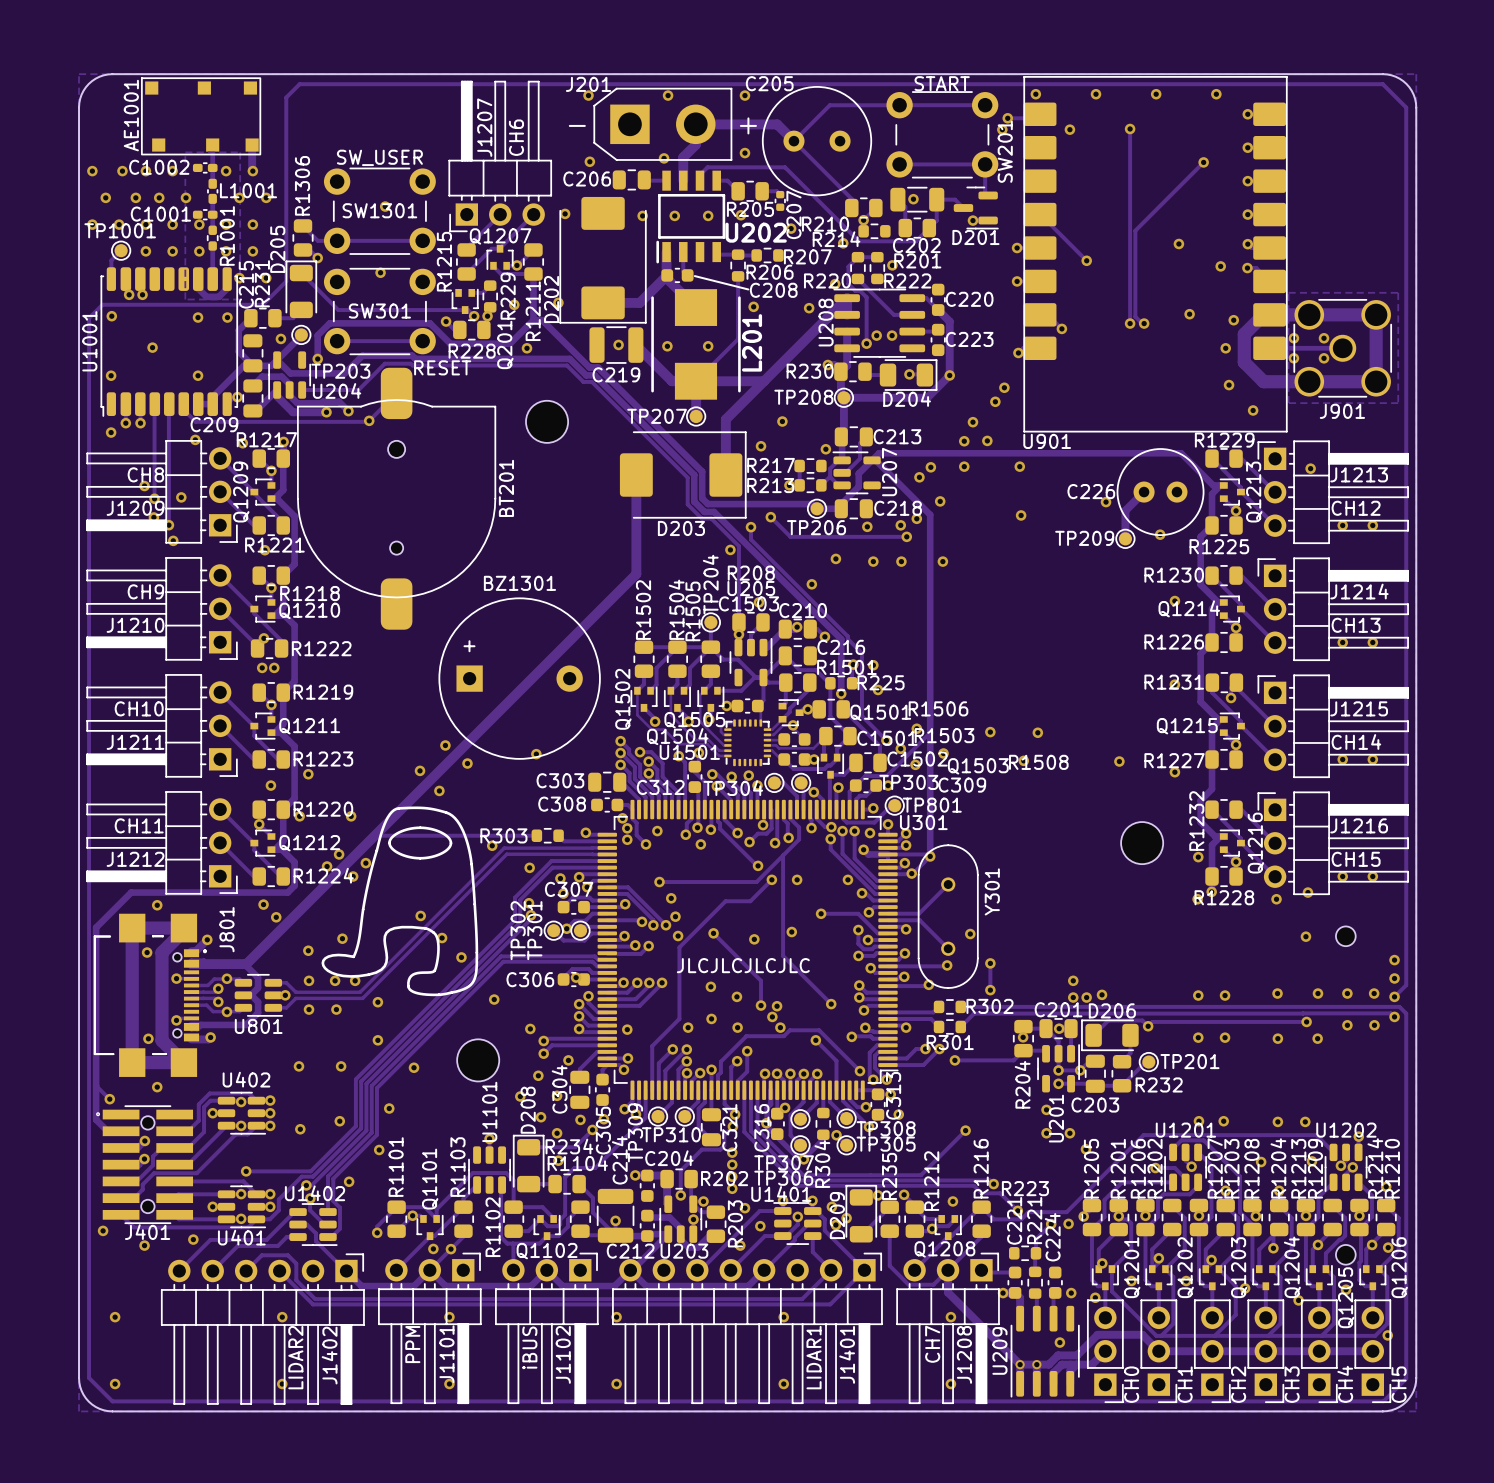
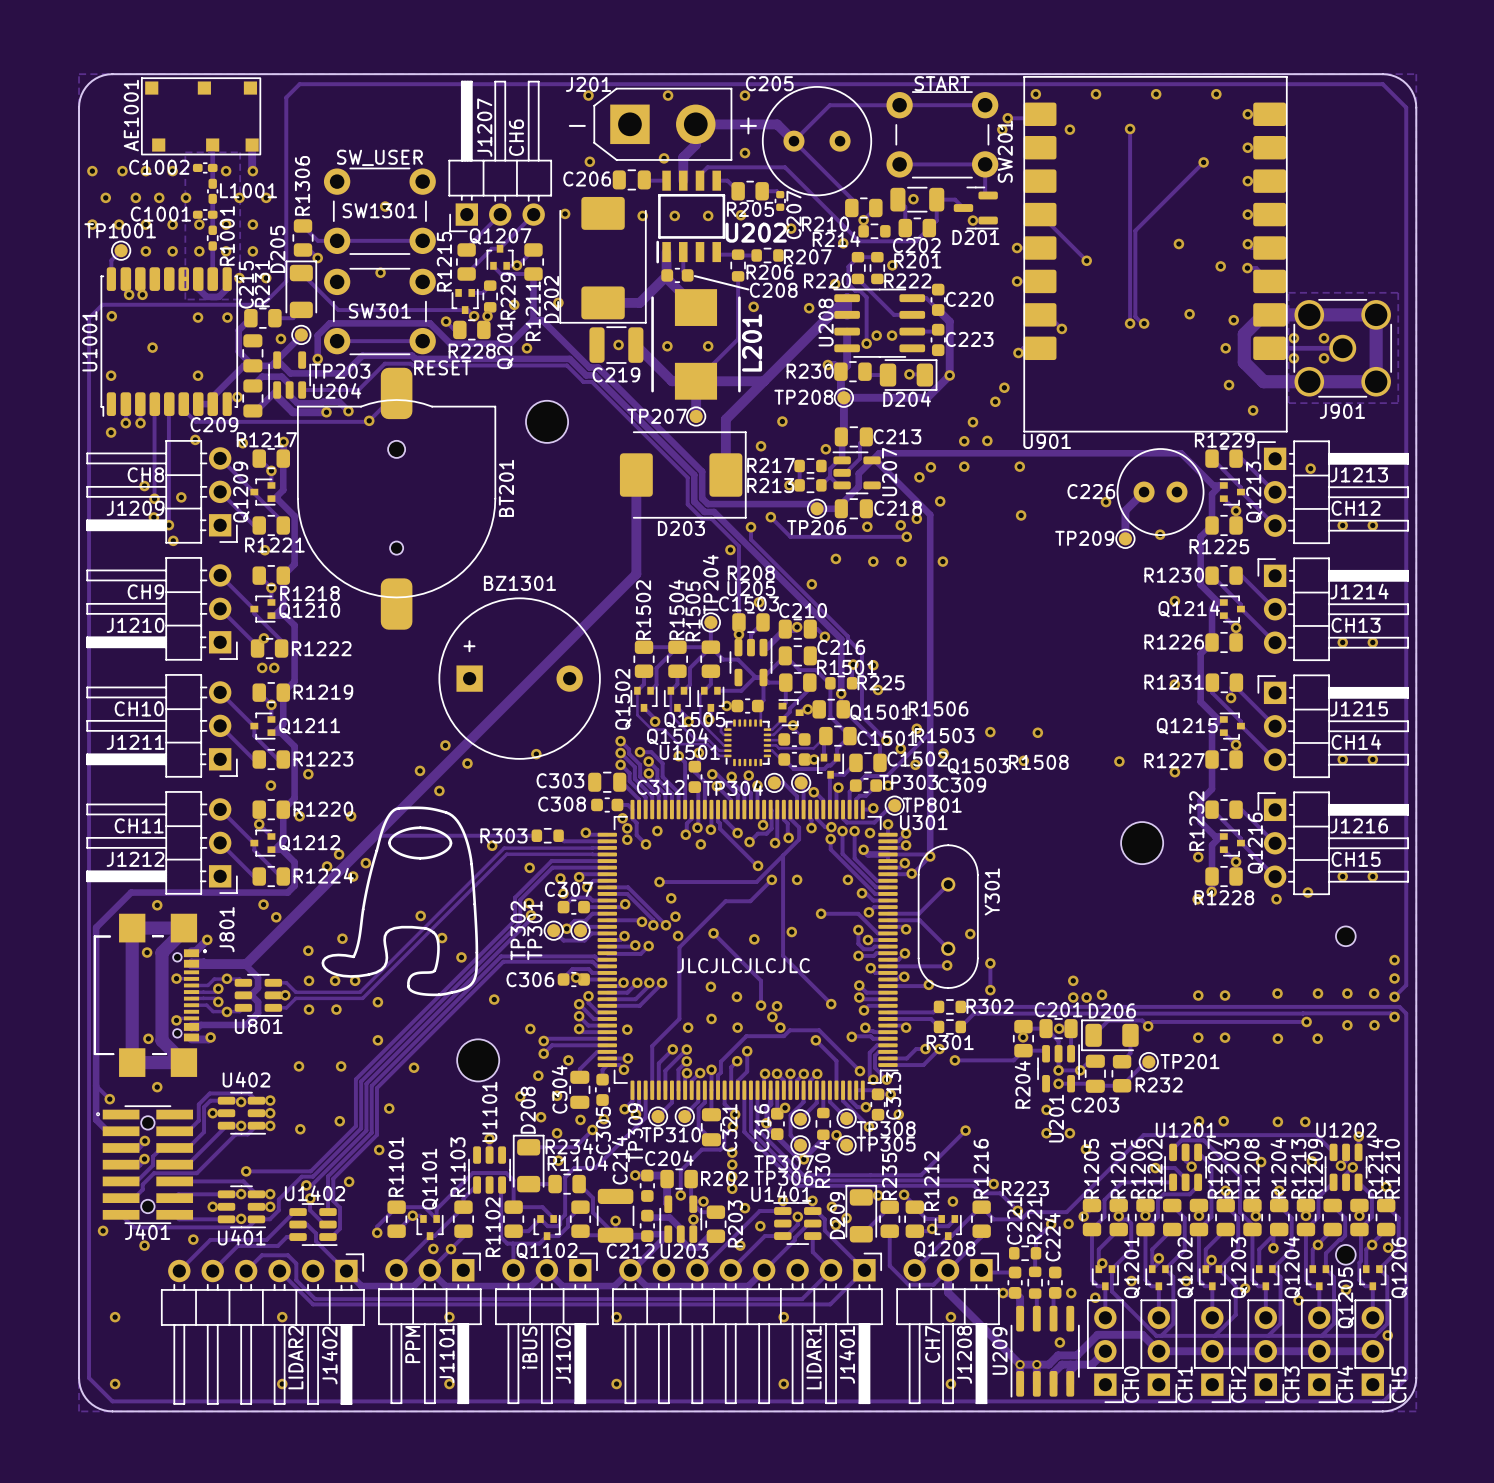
via: (1305, 936) -> none

